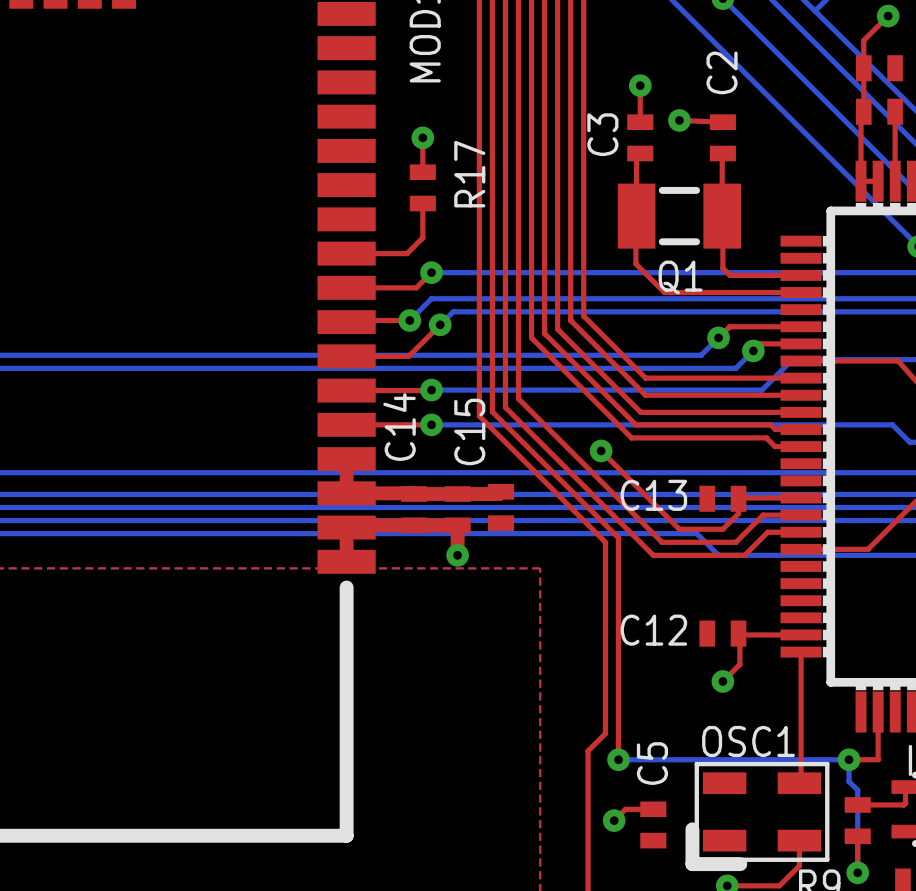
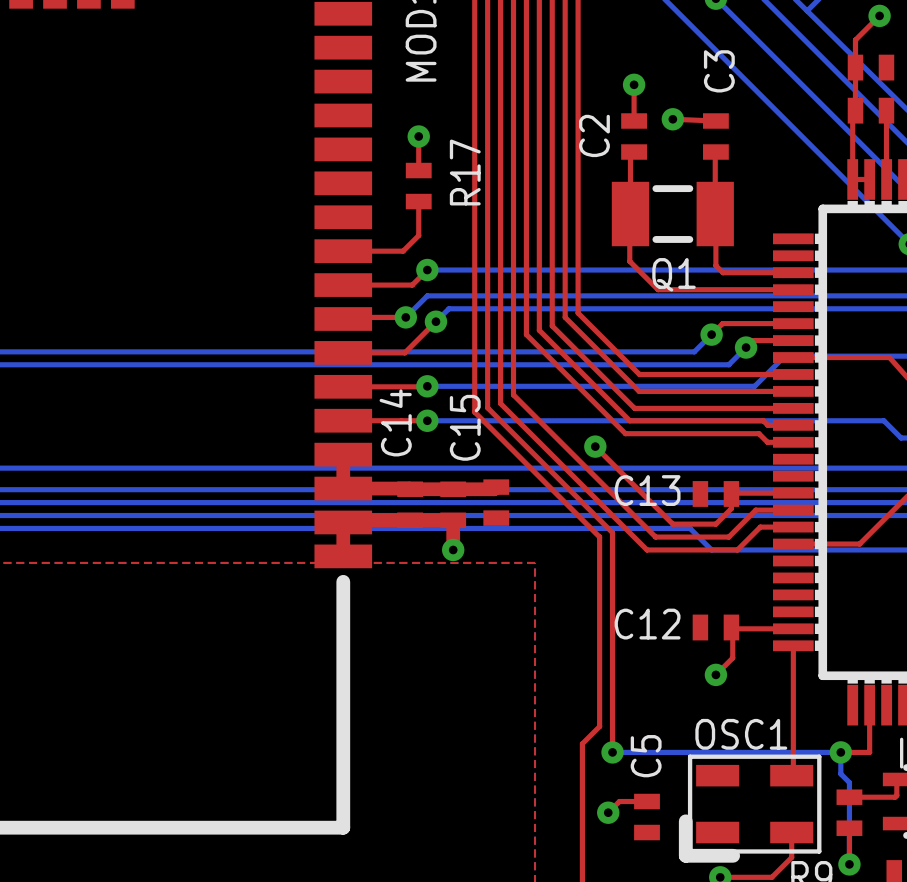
C2 name position: C2 (722, 72) -> C2 (594, 135)
C3 name position: C3 (602, 134) -> C3 (719, 71)

